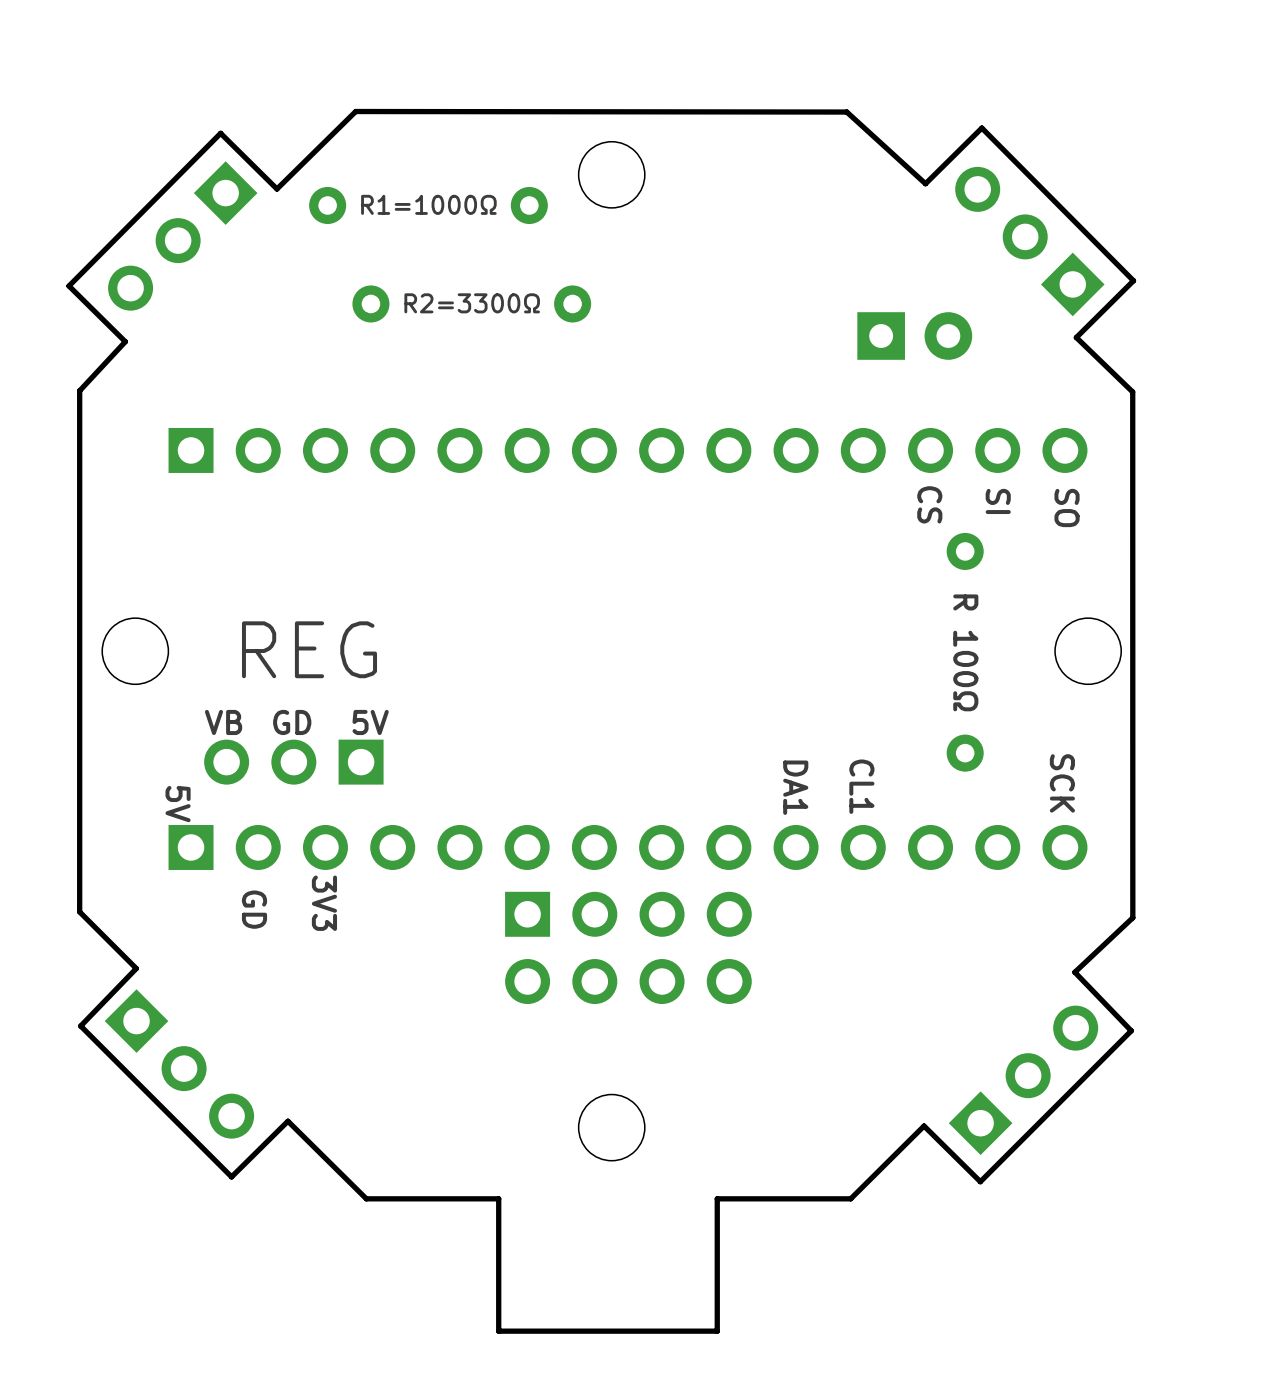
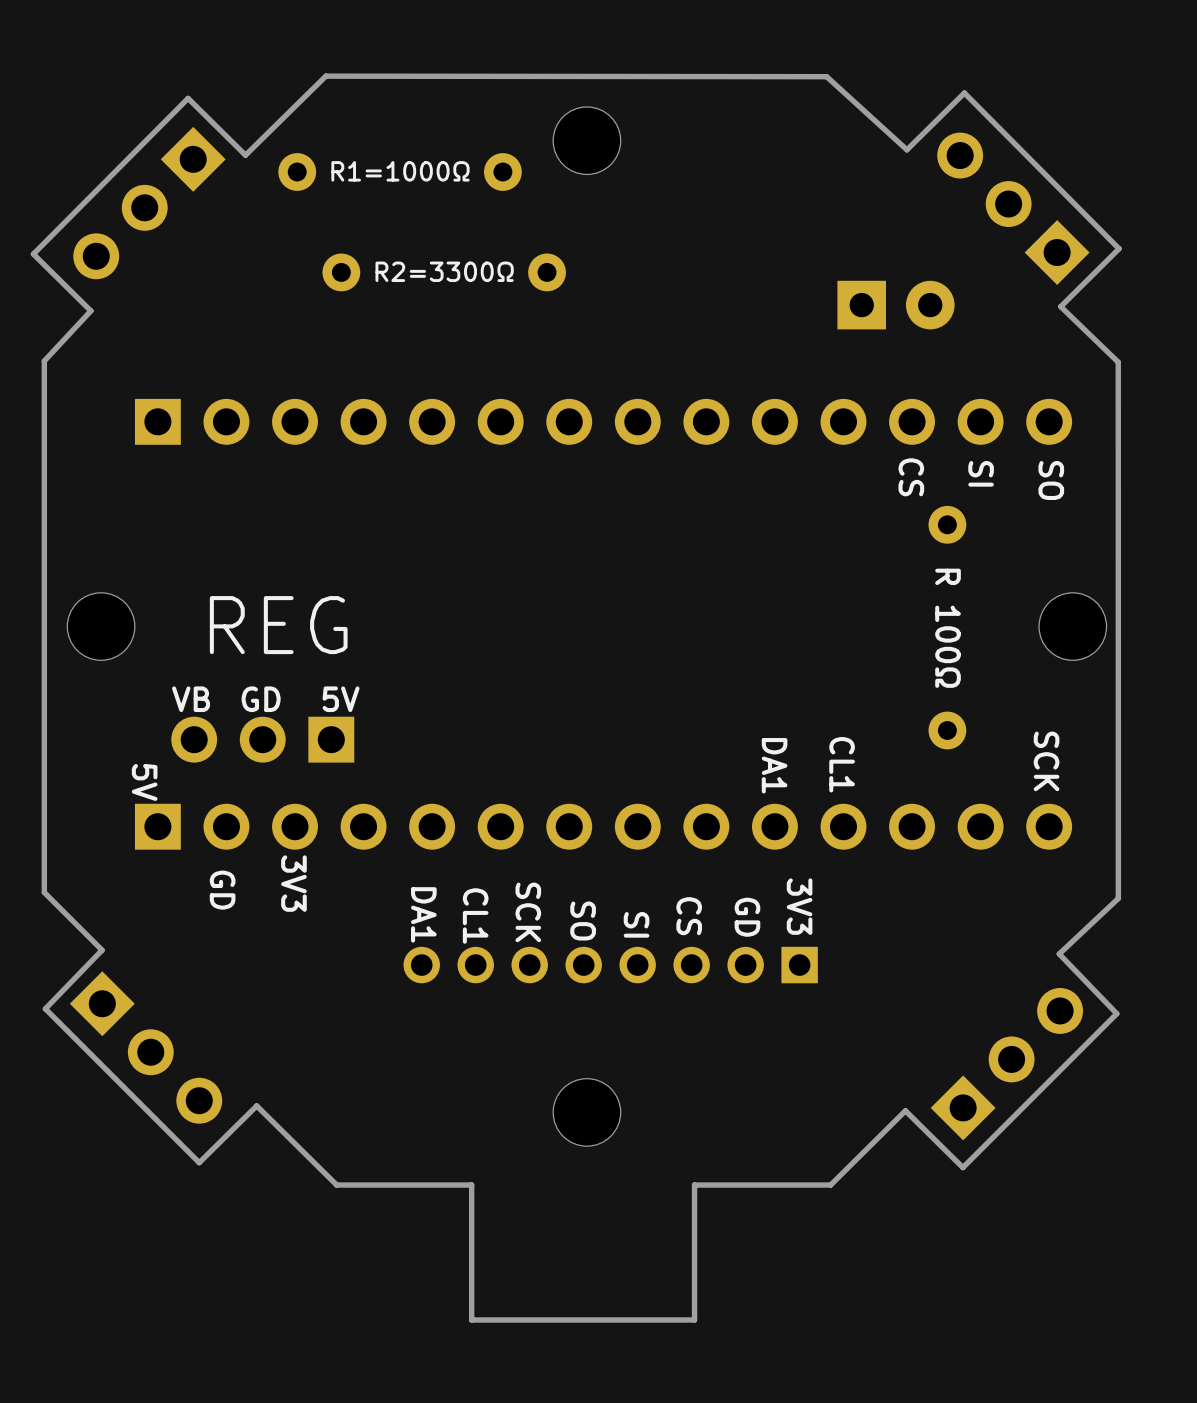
text: none -> 3V3 (799, 906)
text: none -> SCK (528, 912)
text: none -> DA1 (423, 914)
text: none -> CL1 (475, 916)
text: none -> CS (689, 916)
text: none -> GD (747, 917)
text: none -> SO (583, 921)
text: none -> SI (636, 924)
part: (628, 947) -> none
part: none -> (610, 965)

